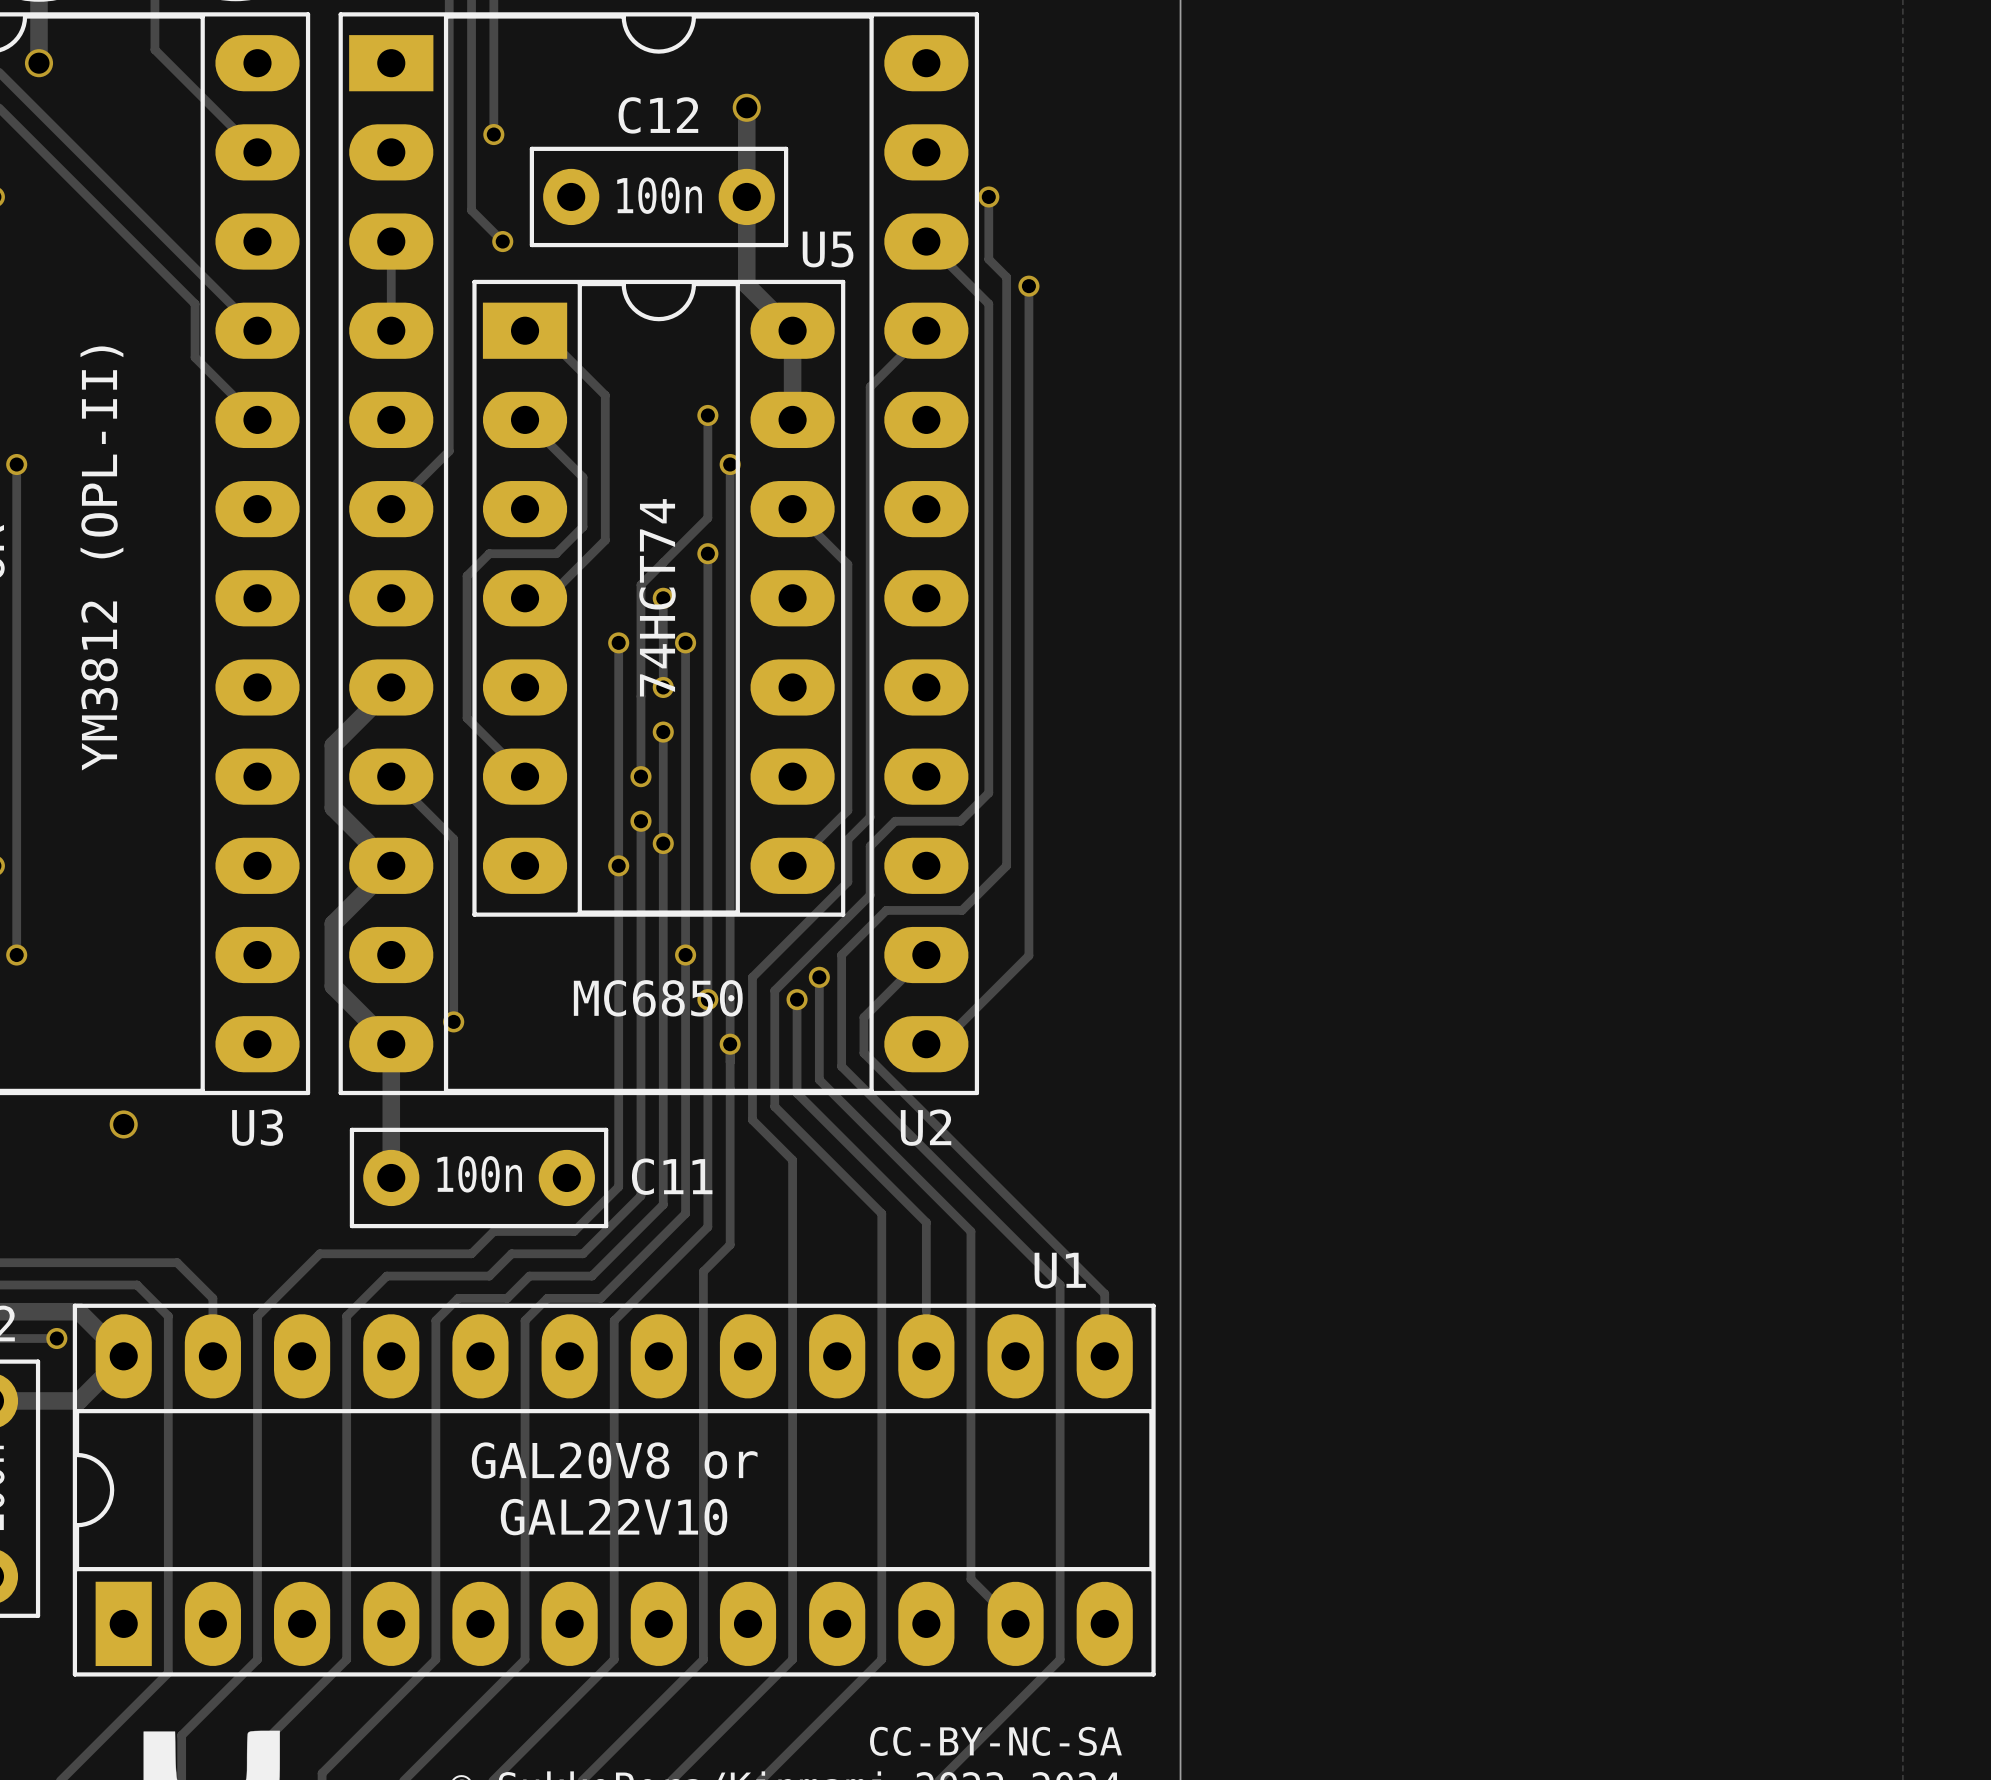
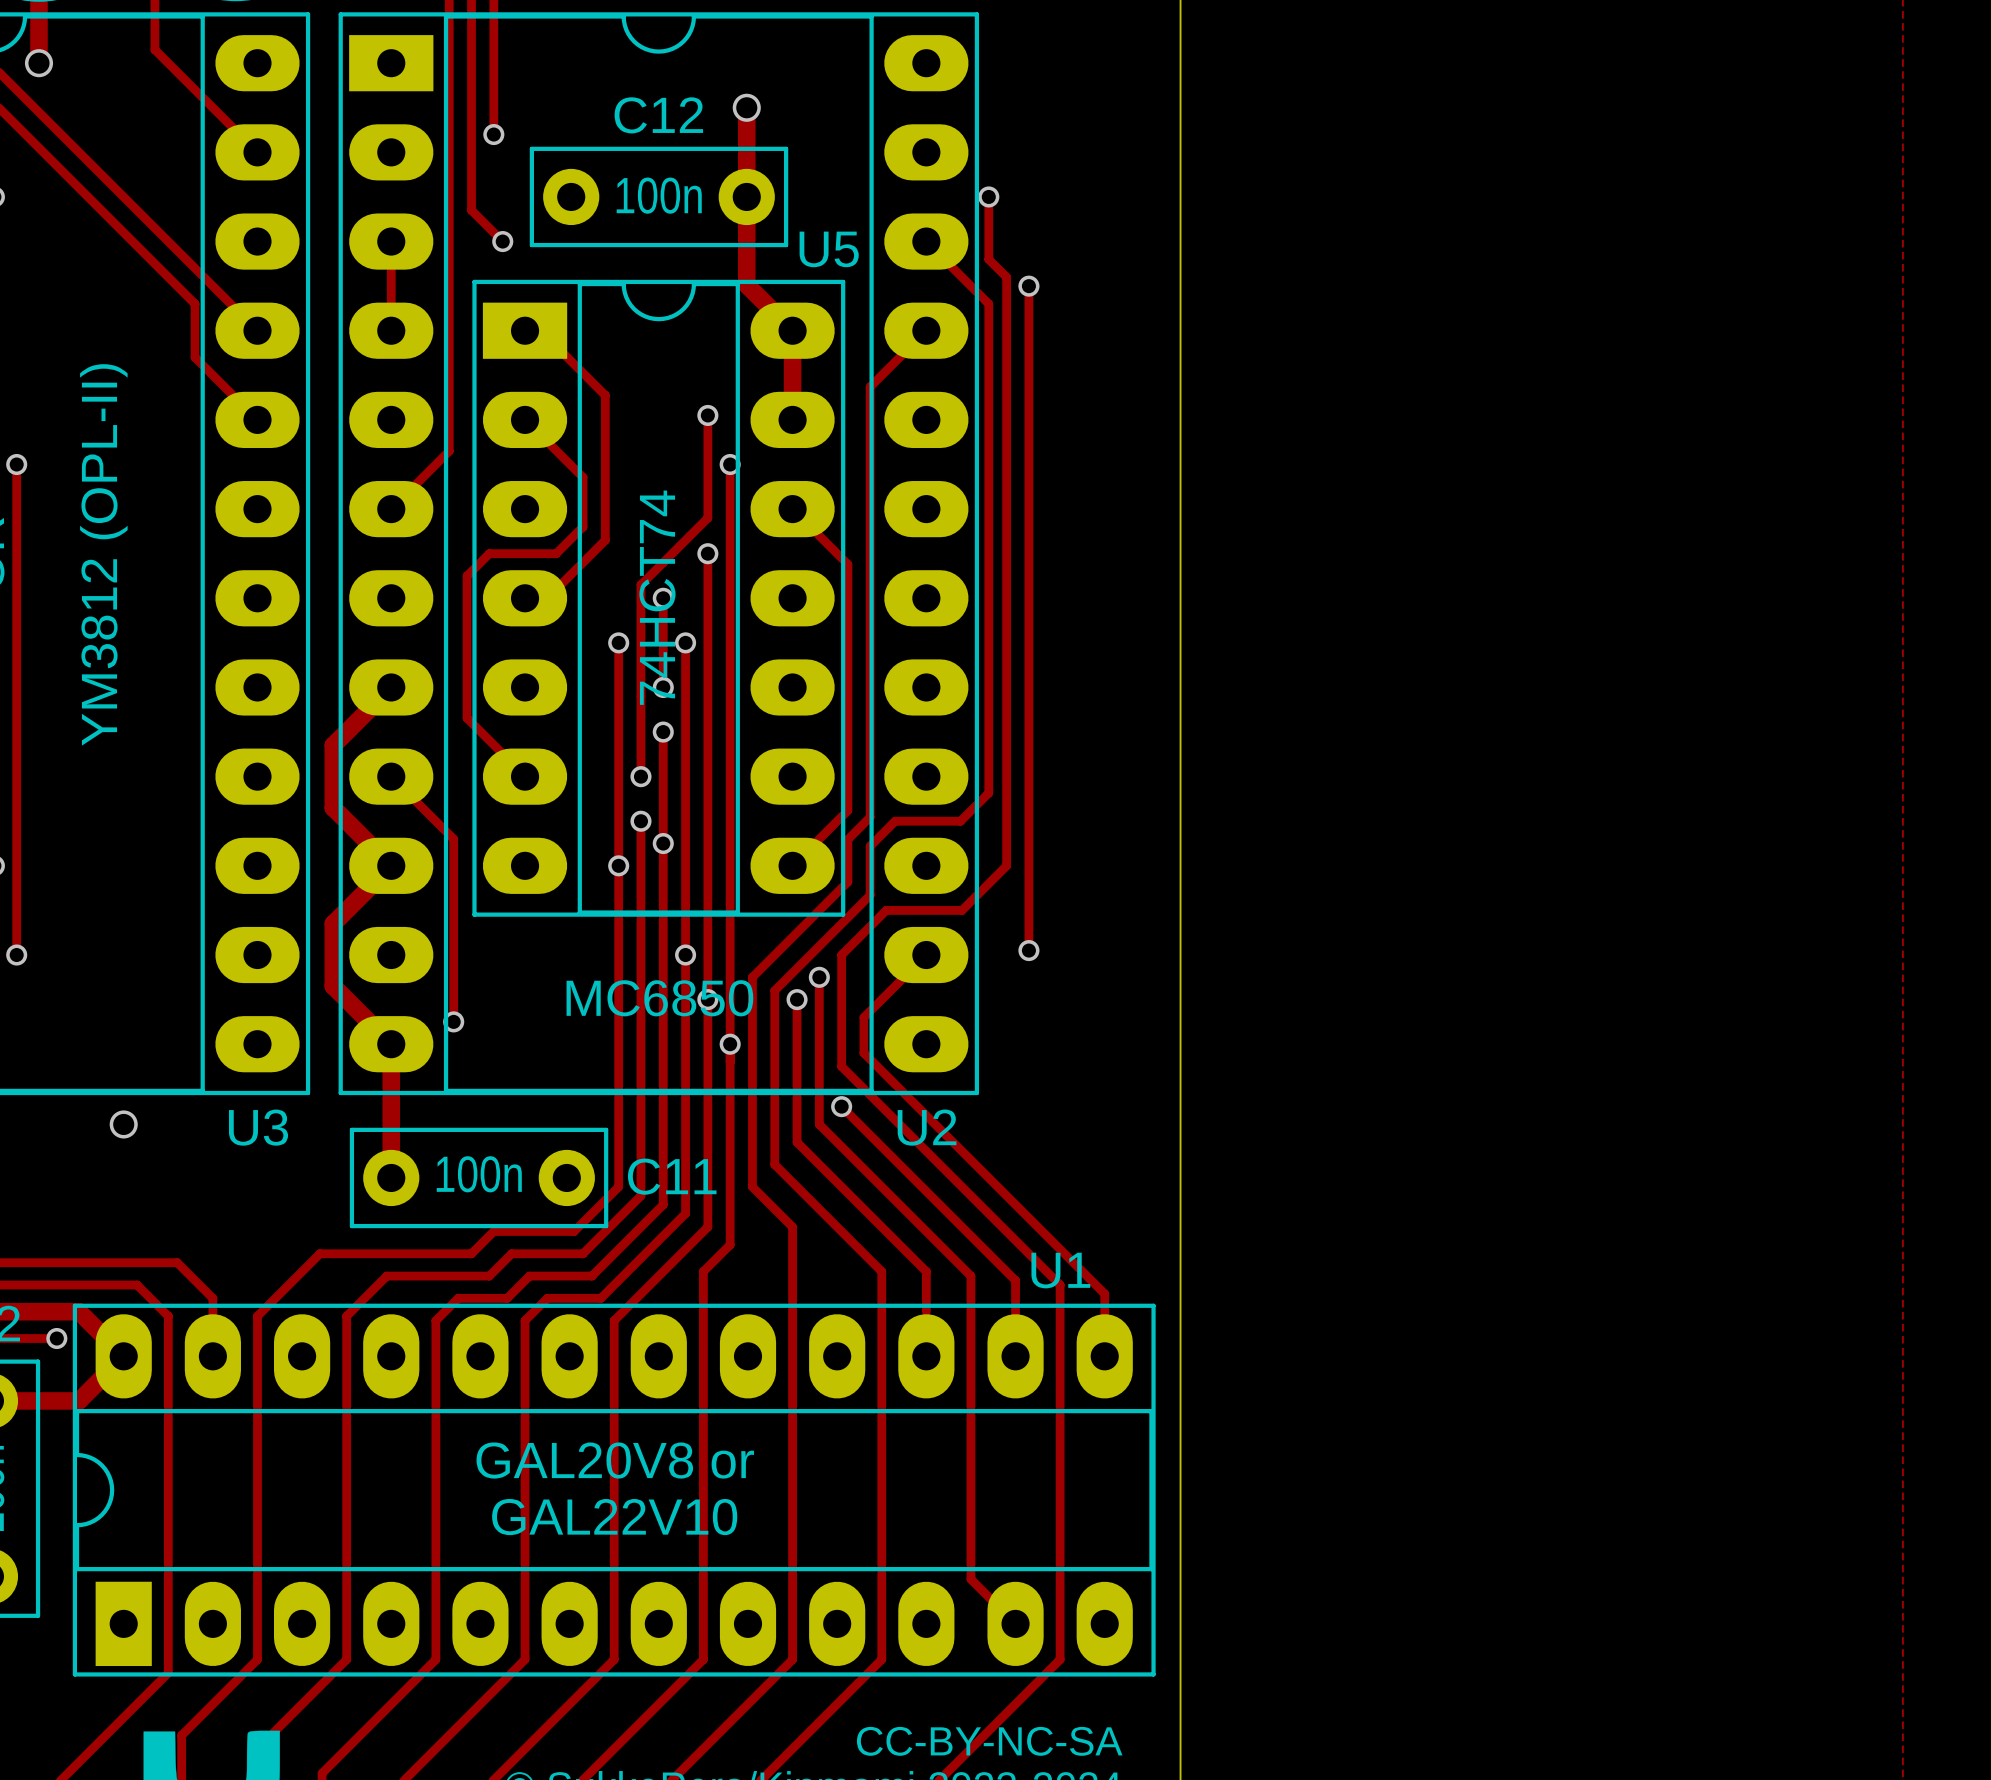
track: (1028, 950) (1028, 955) (940, 1044) -> none
via: none -> (1028, 950)
track: (819, 1079) (970, 1231) (970, 1276) -> (819, 1079) (819, 1124) (970, 1276)
track: (797, 1093) (926, 1222) (926, 1271) -> (797, 1093) (797, 1142) (926, 1271)
track: (774, 1106) (881, 1213) (881, 1271) -> (774, 1106) (774, 1164) (881, 1271)
track: none -> (841, 1106) (1015, 1280) (1015, 1356)
via: none -> (841, 1106)
track: (752, 1120) (792, 1160) (792, 1227) -> (752, 1120) (752, 1186) (792, 1227)

